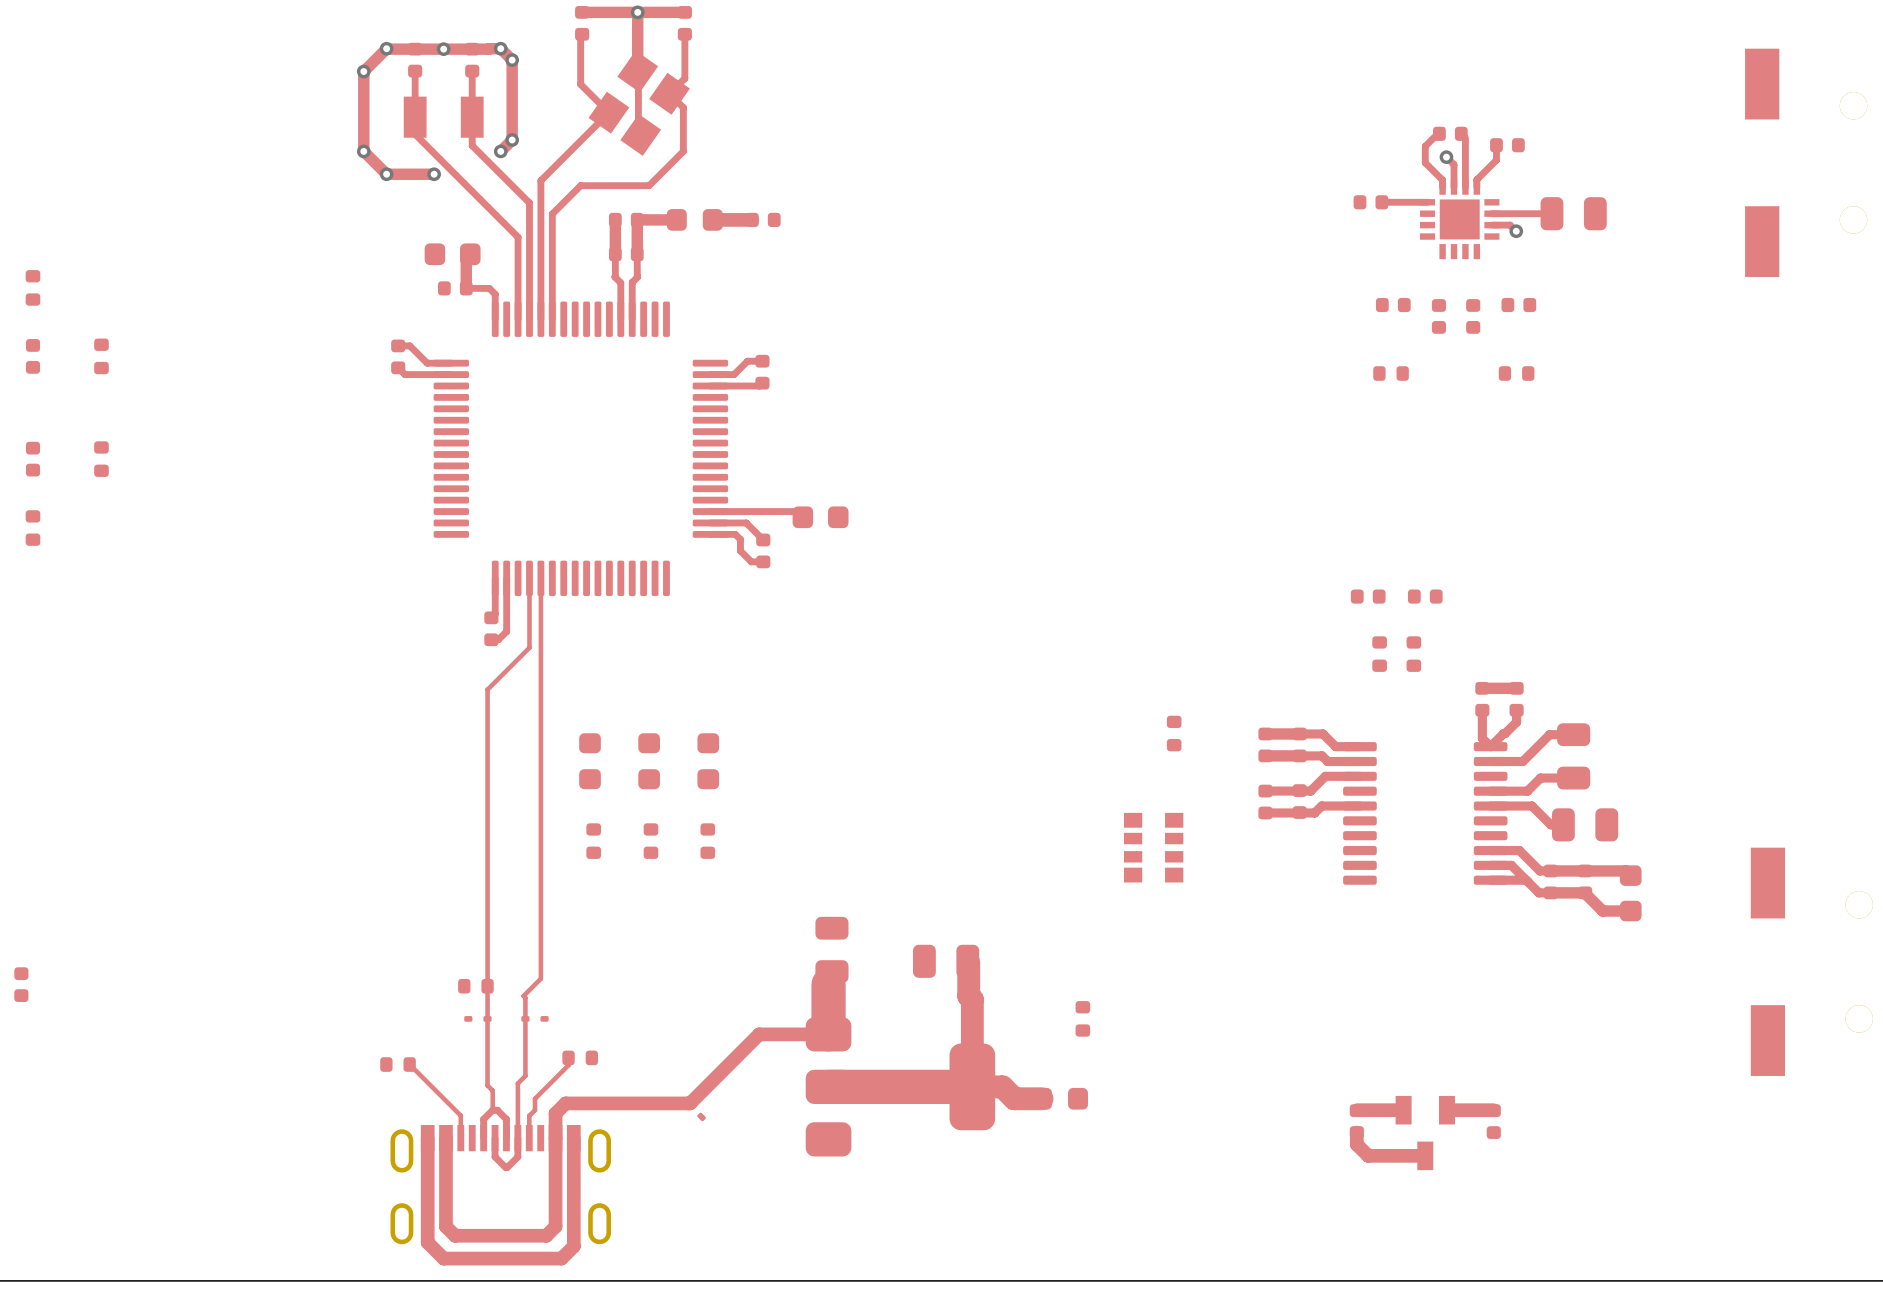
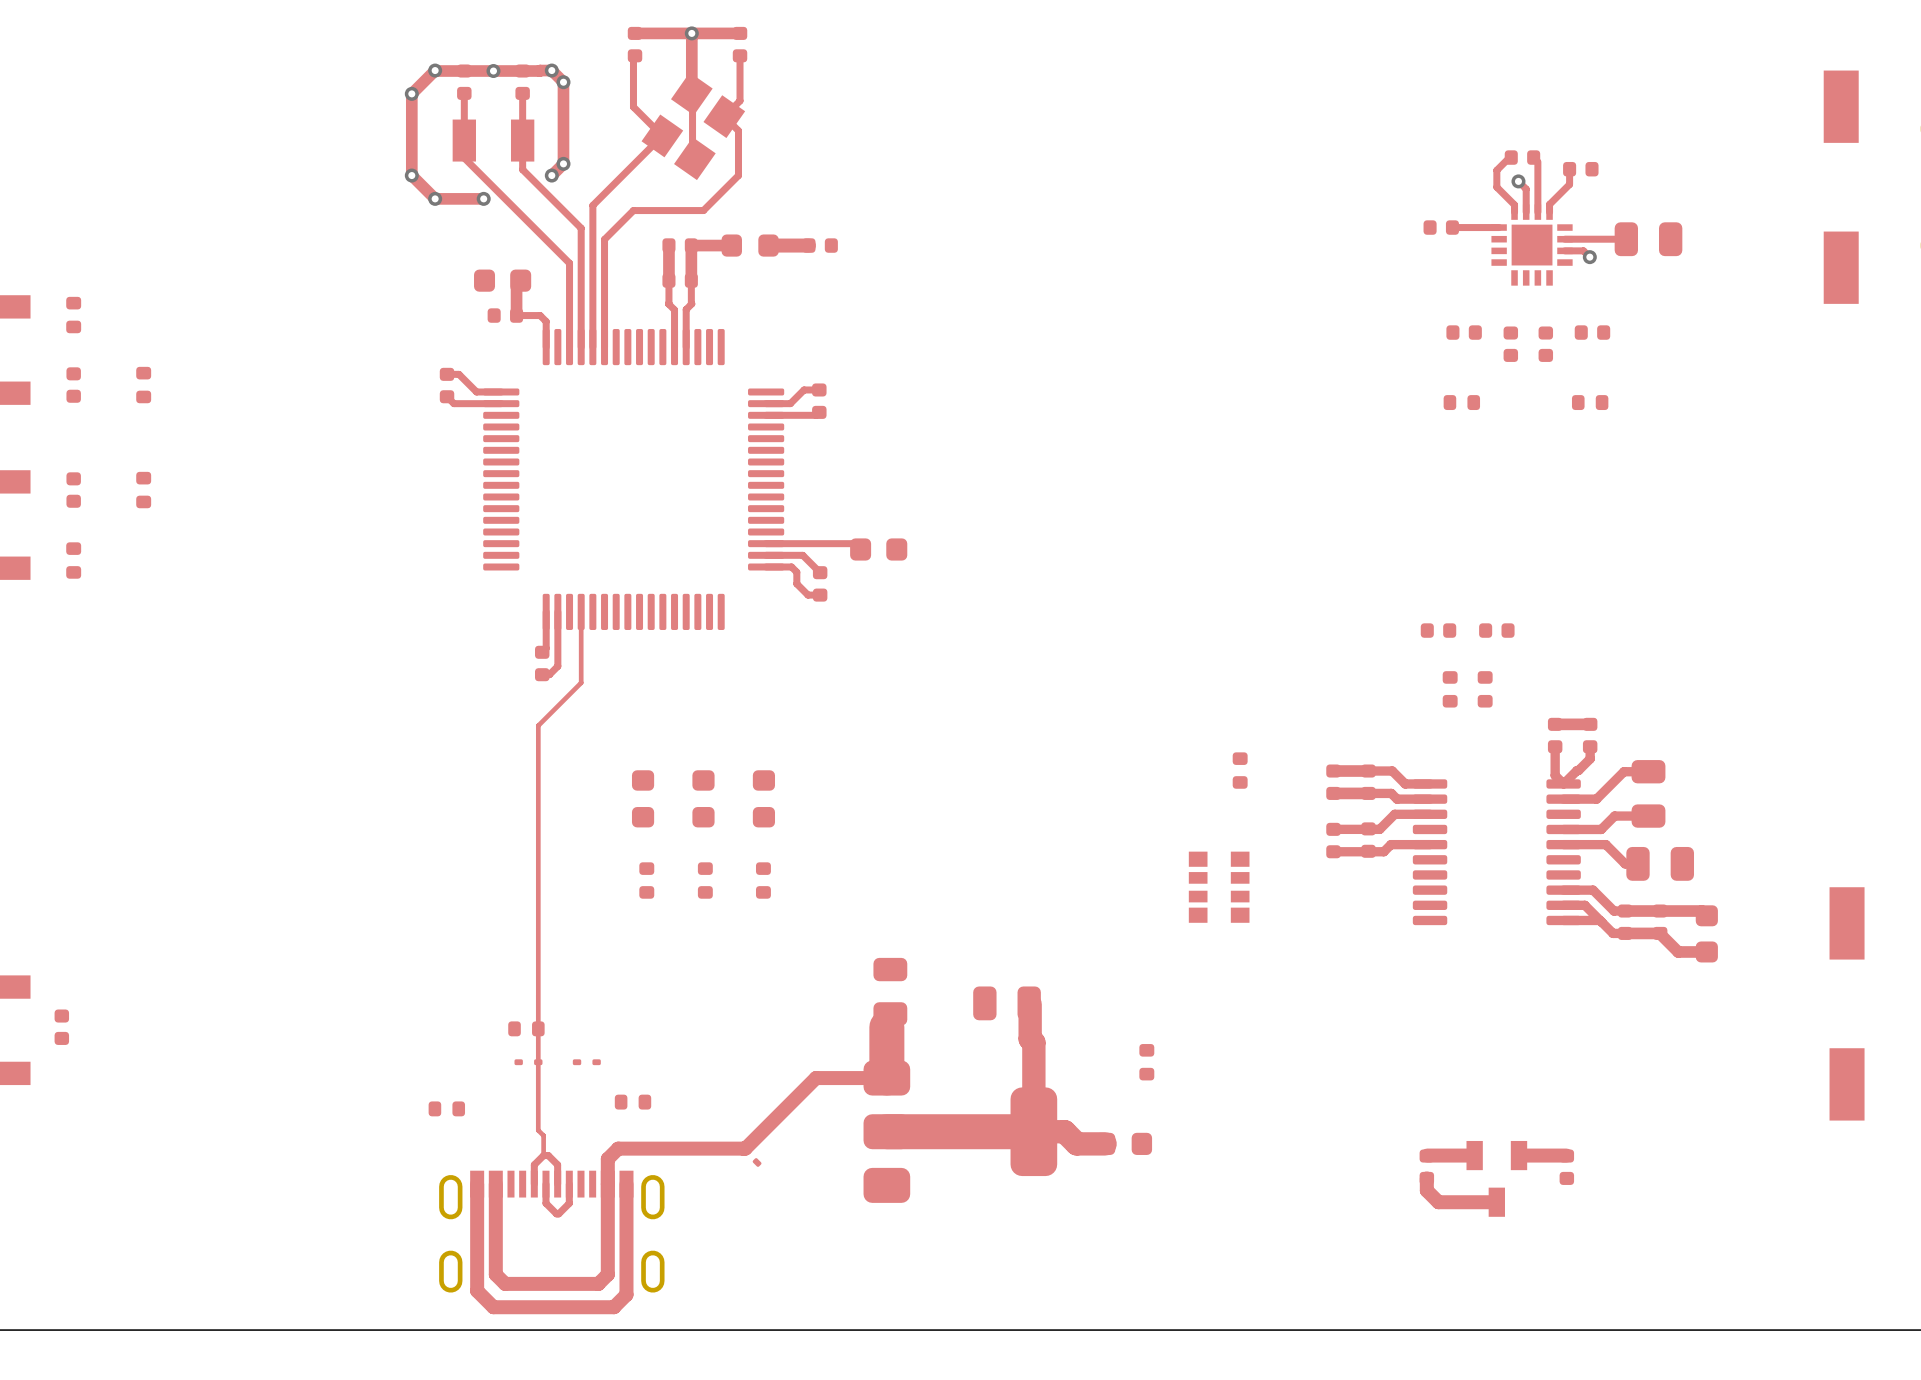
top track: (540, 578) (540, 978) (523, 996) (525, 997) (525, 1075) (517, 1083) (517, 1138) -> none
top track: (568, 1057) (568, 1065) (535, 1098) (535, 1110) (529, 1115) (529, 1138) -> none
top track: (409, 1064) (460, 1115) (460, 1138) -> none

